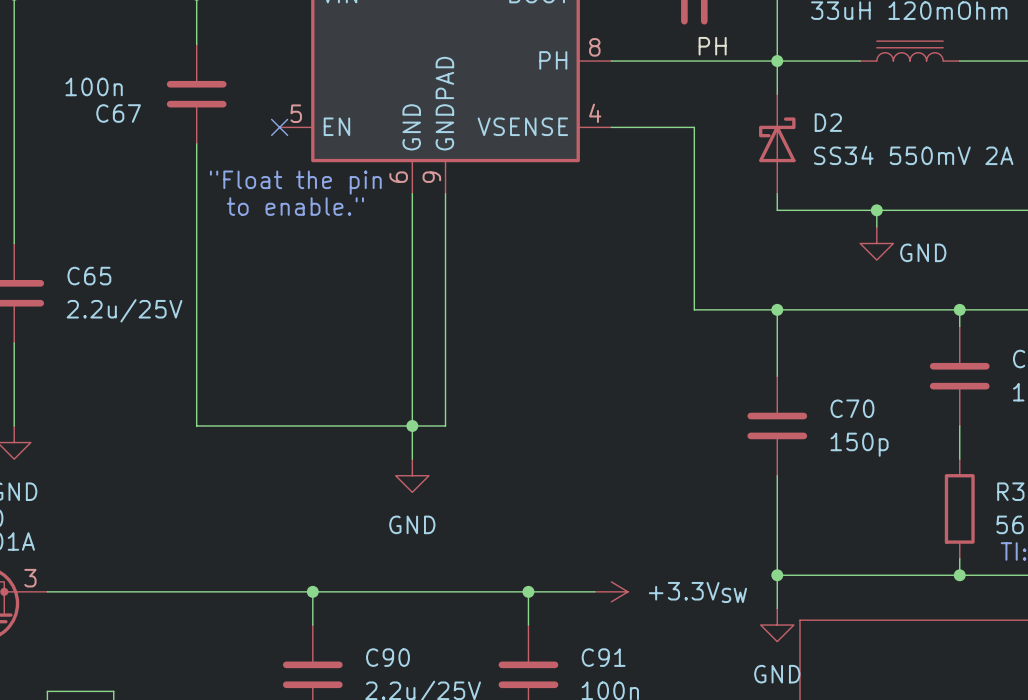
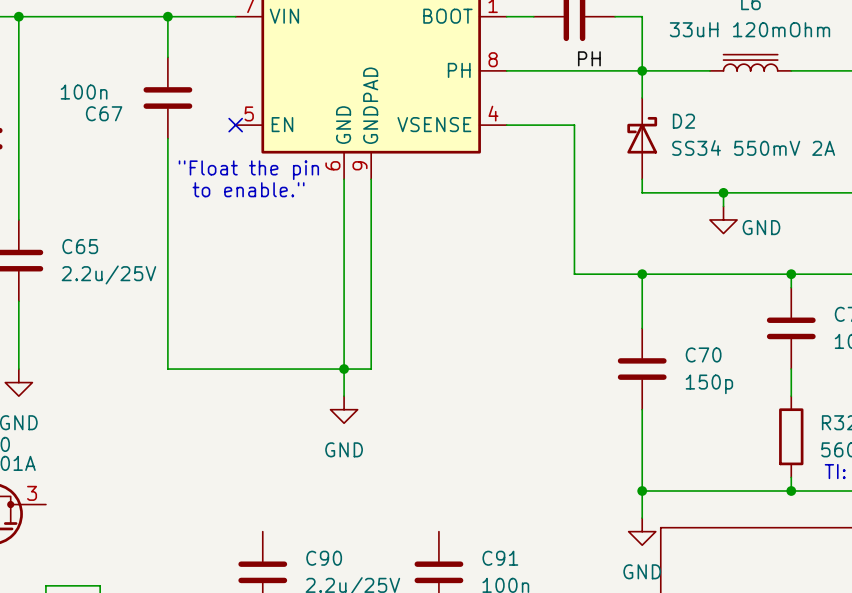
wire: (47, 591) (594, 591) -> none
wire: (312, 591) (312, 625) -> none
junction: (312, 591) -> none
wire: (528, 591) (528, 625) -> none
junction: (528, 591) -> none
power symbol: +3.3VSW (611, 591) -> none

